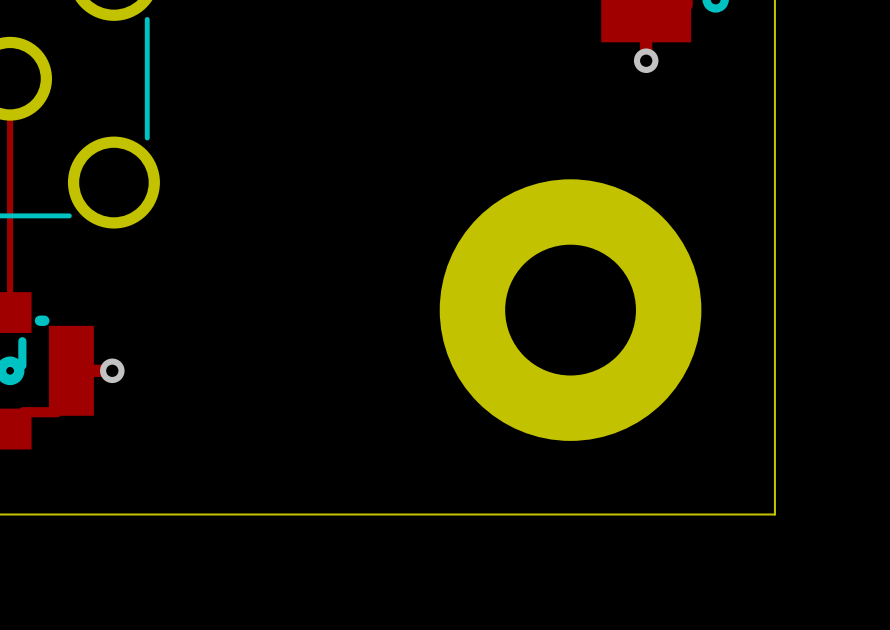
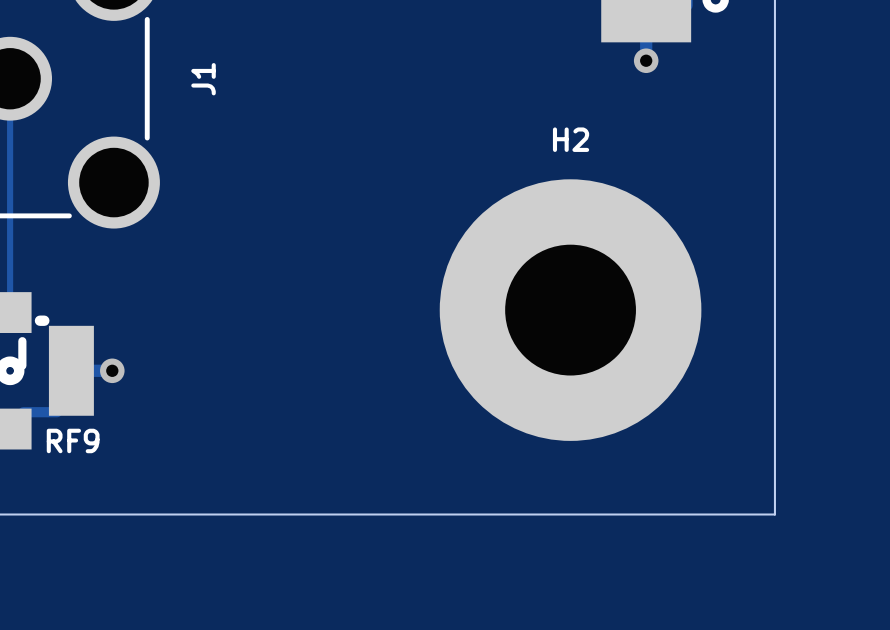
J1 name: none -> J1 (203, 79)
H2 name: none -> H2 (571, 139)
RF9 name: none -> RF9 (73, 440)

